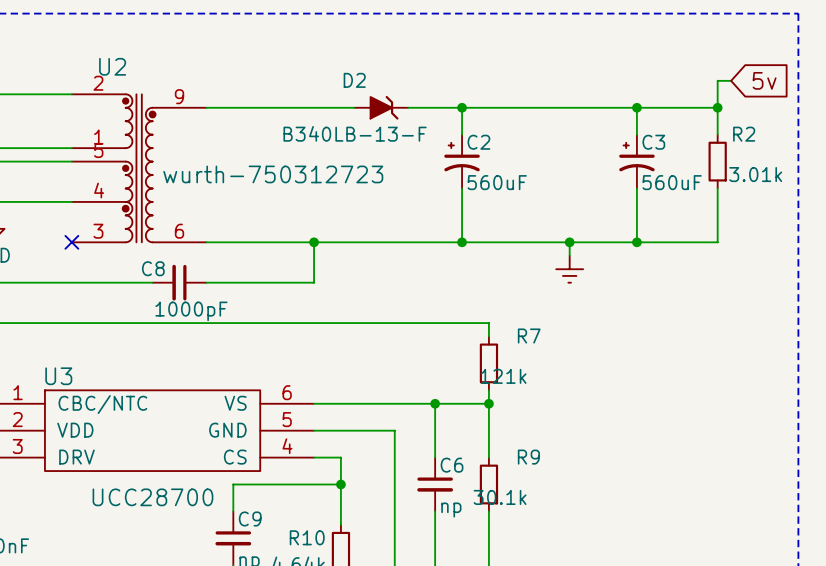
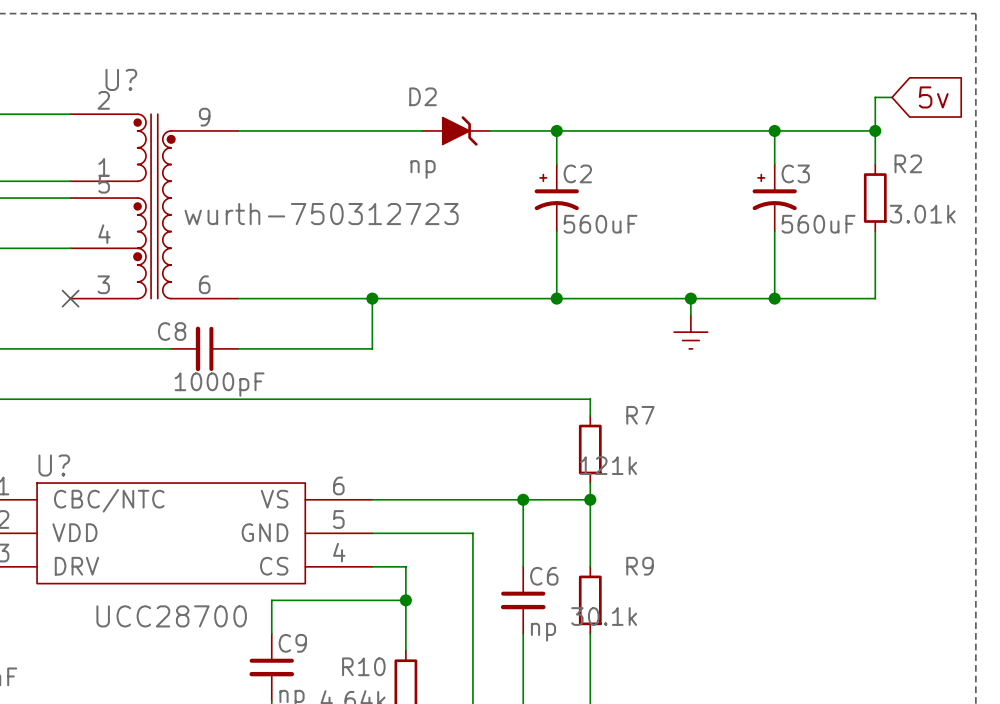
U2 name: U2 (112, 66) -> U? (121, 79)
D2 value: B340LB-13-F (355, 133) -> np (423, 169)
U3 name: U3 (58, 376) -> U? (54, 465)

